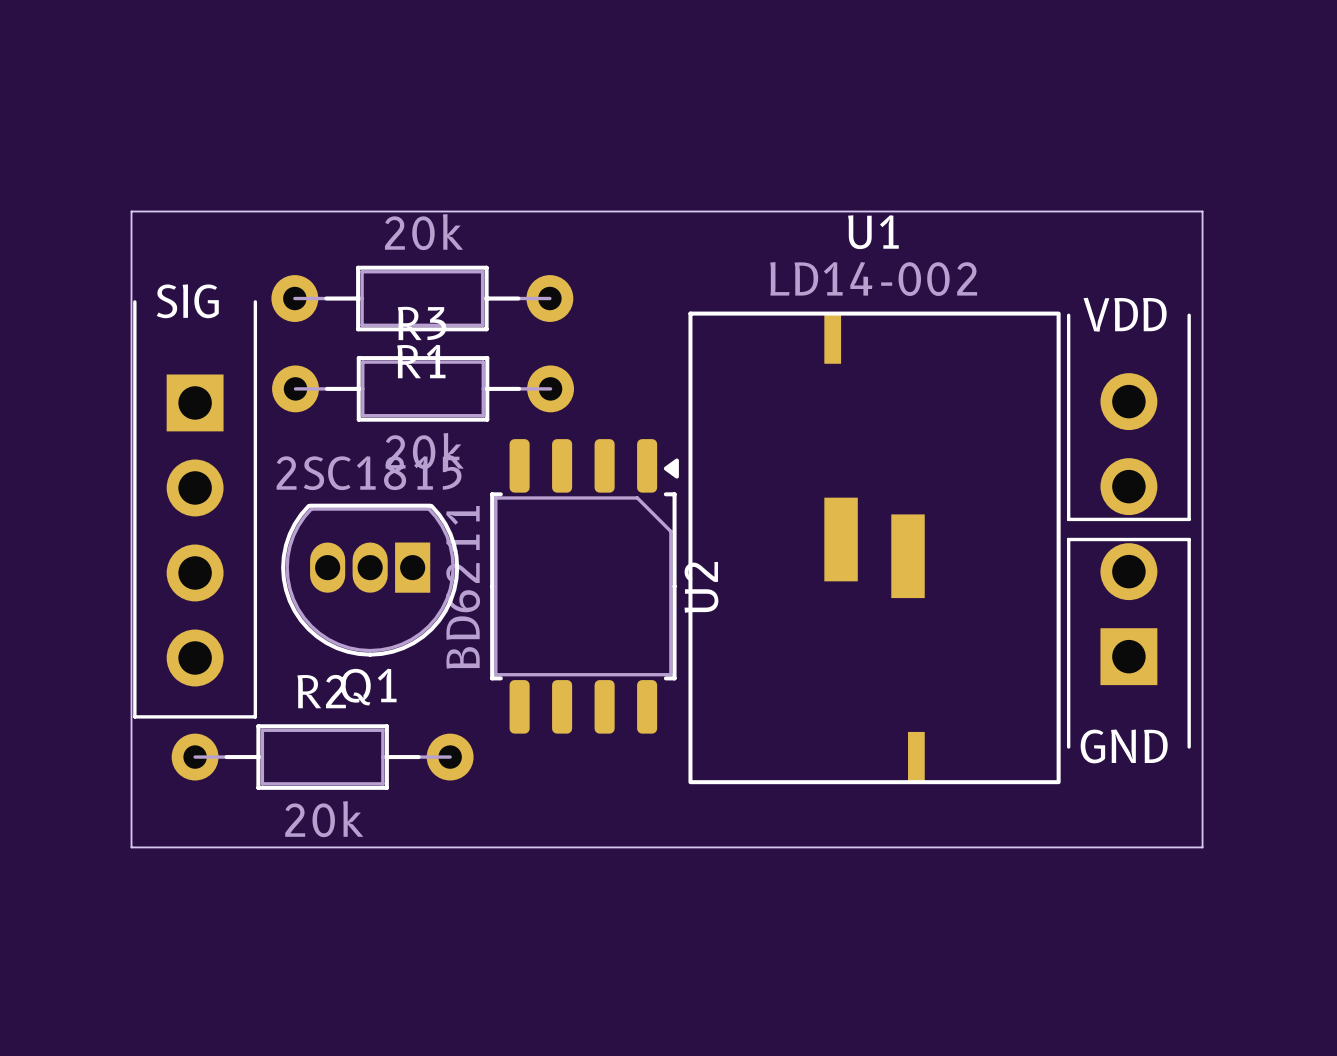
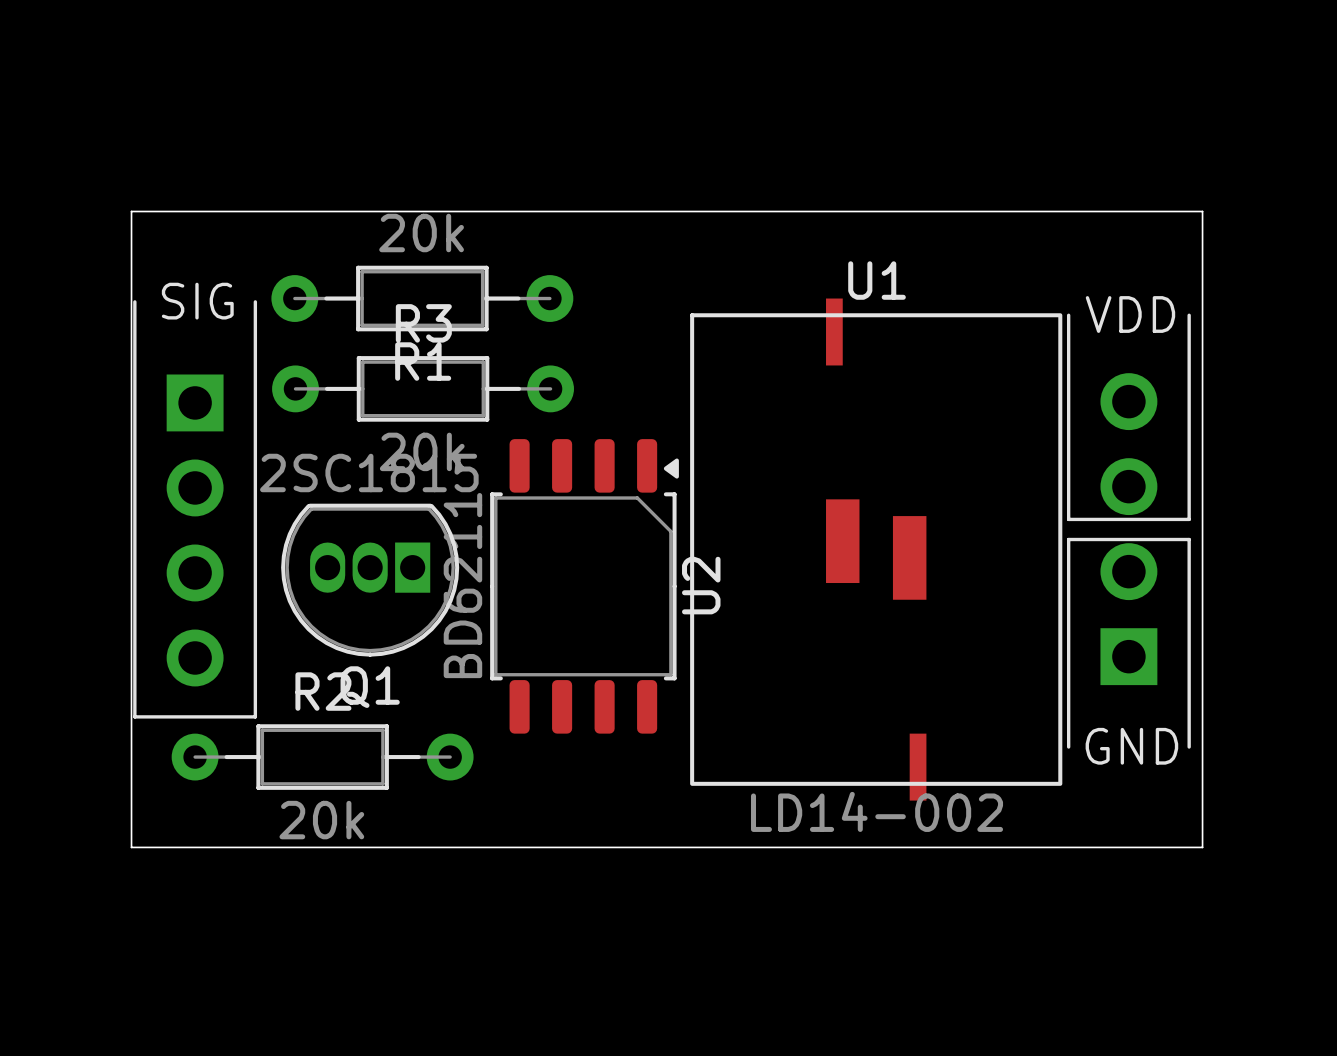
U1 name position: U1 (873, 232) -> U1 (877, 280)
U1 value position: LD14-002 (873, 279) -> LD14-002 (877, 811)
U1 footprint: [688, 311, 1061, 785] -> [690, 298, 1063, 801]

